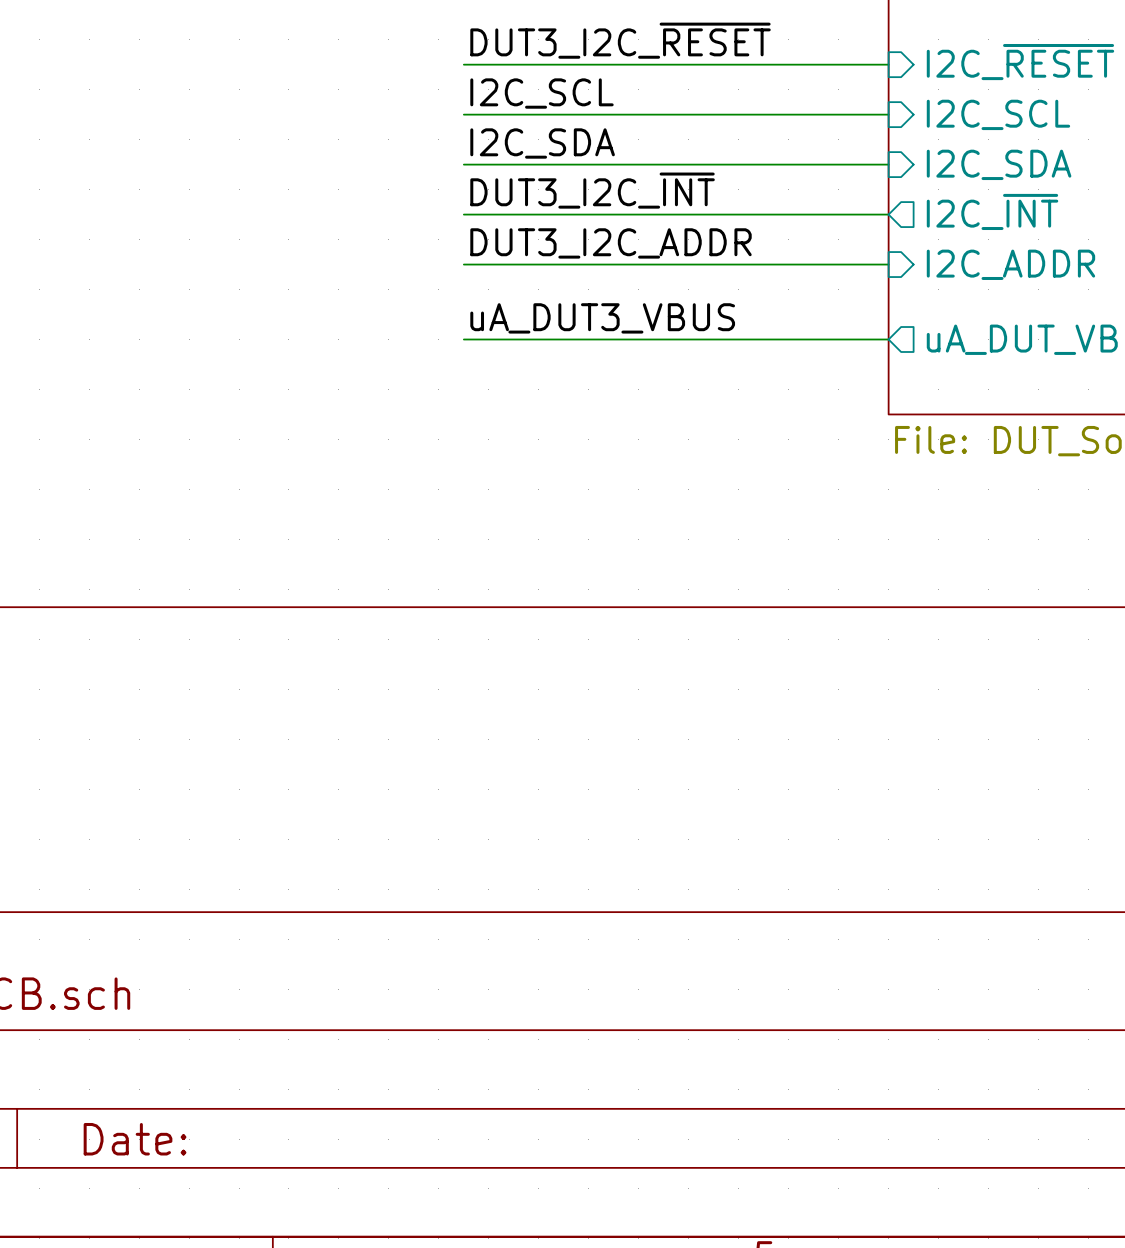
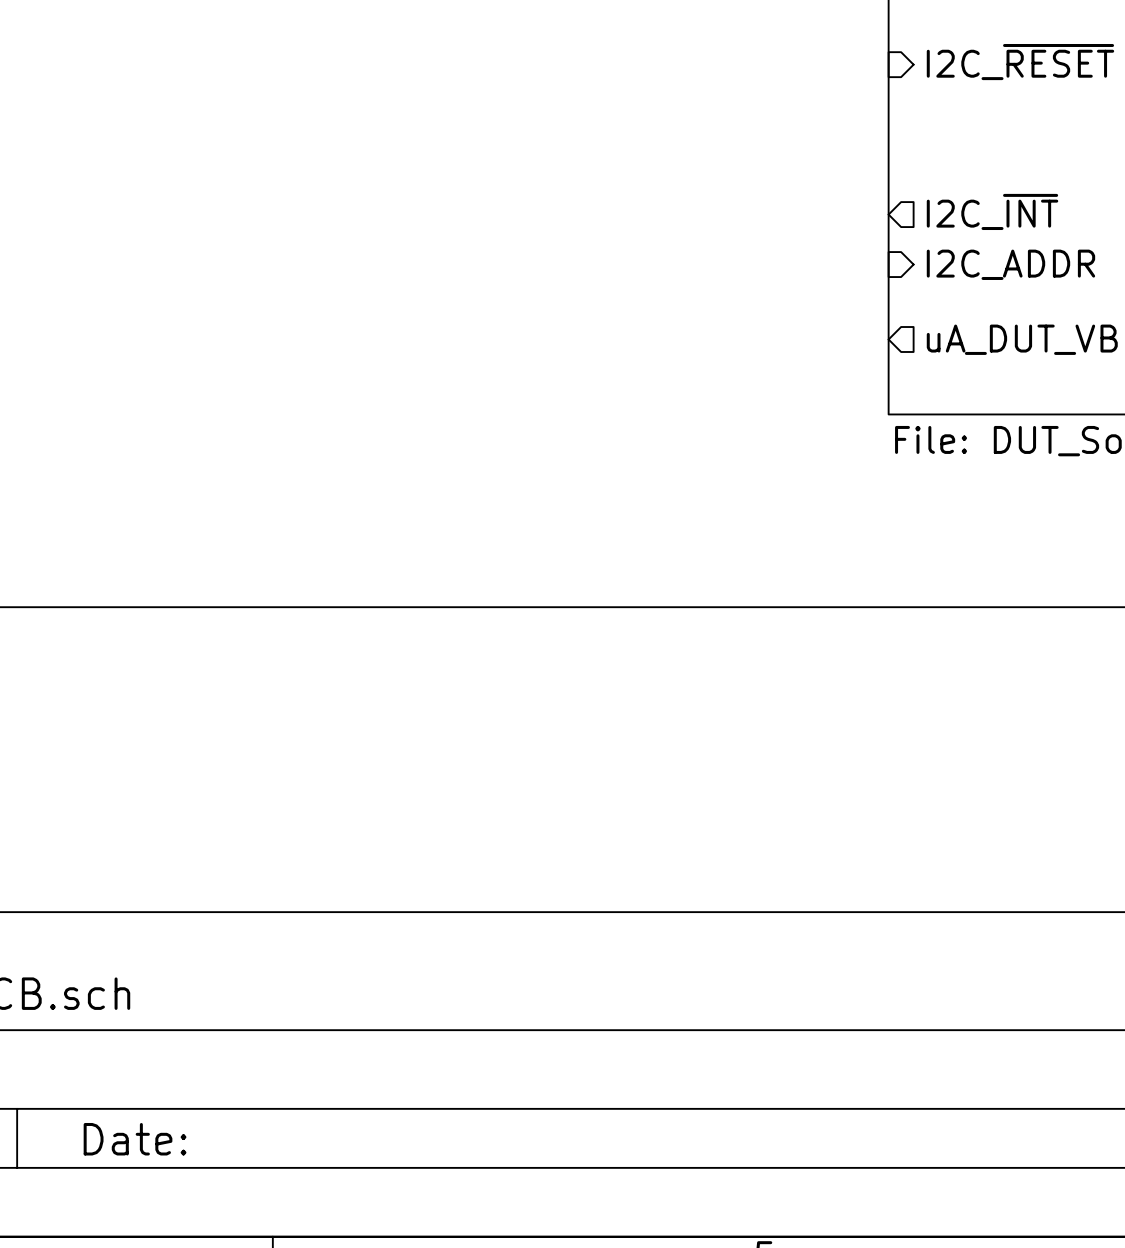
label: DUT3_I2C_~{RESET} (620, 40) -> none
wire: (463, 64) (888, 64) -> none
label: I2C_SCL (541, 93) -> none
wire: (463, 114) (888, 114) -> none
sheet pin: I2C_SCL (998, 114) -> none
label: I2C_SDA (542, 143) -> none
wire: (463, 164) (888, 164) -> none
sheet pin: I2C_SDA (999, 164) -> none
label: DUT3_I2C_~{INT} (592, 190) -> none
wire: (463, 214) (888, 214) -> none
label: DUT3_I2C_ADDR (611, 243) -> none
wire: (463, 264) (888, 264) -> none
label: uA_DUT3_VBUS (602, 318) -> none
wire: (463, 339) (888, 339) -> none

